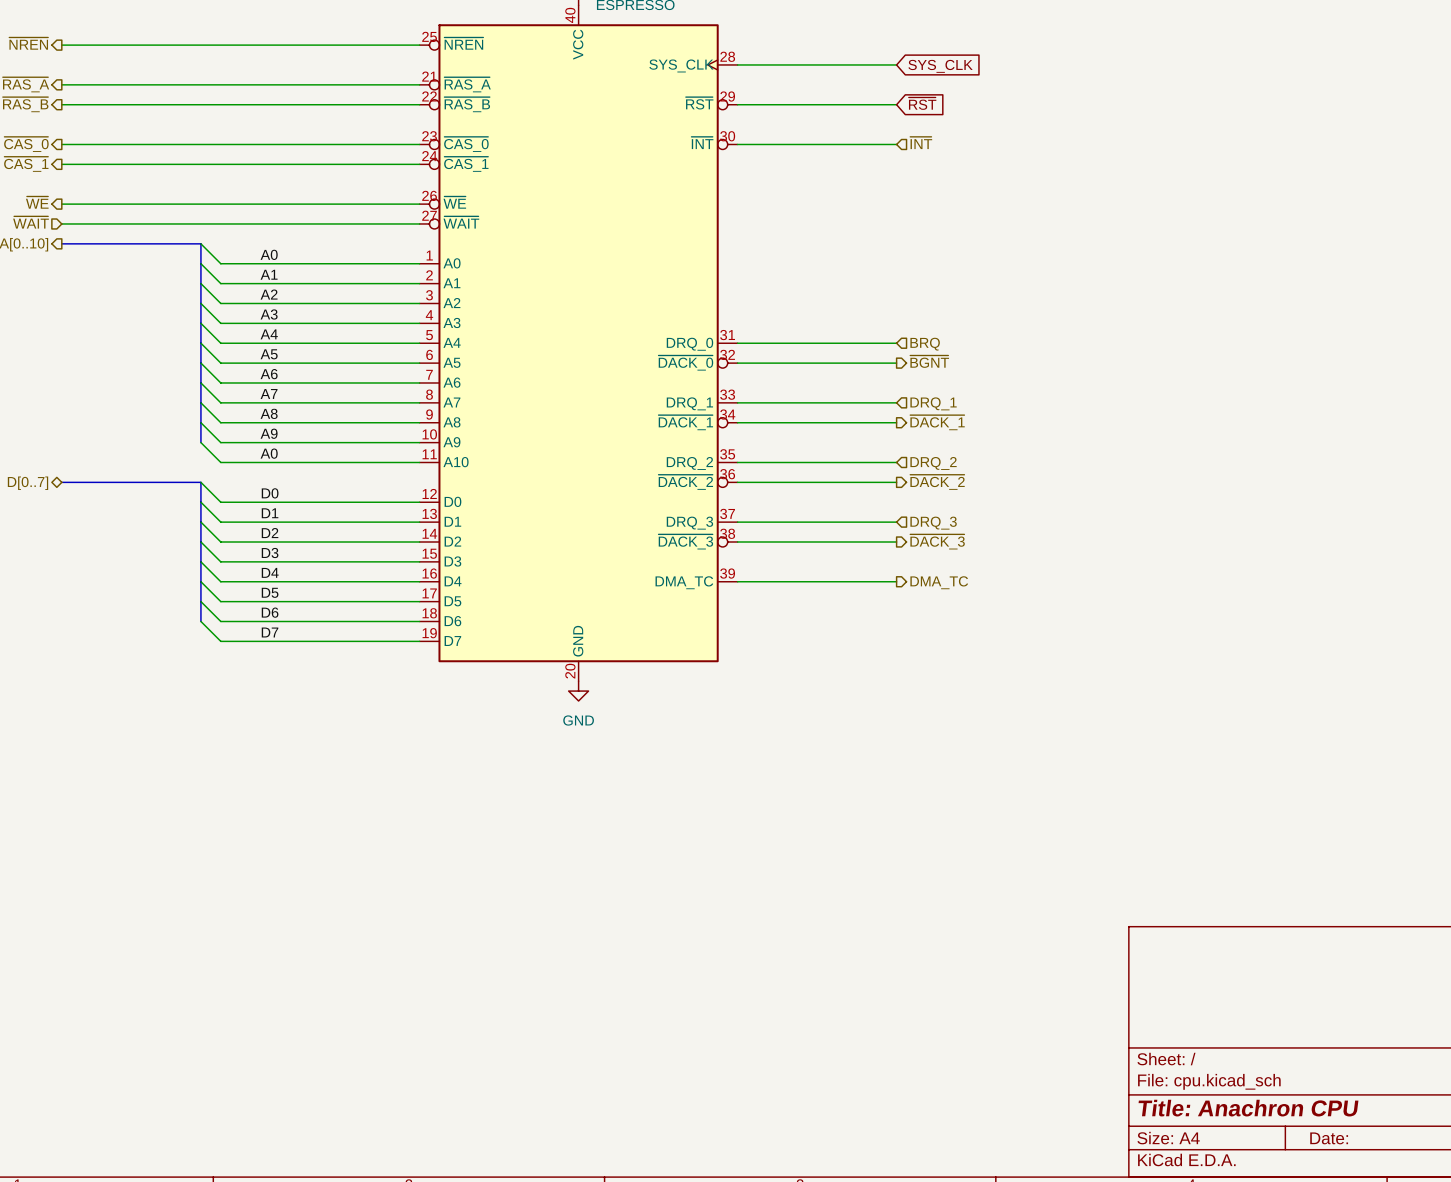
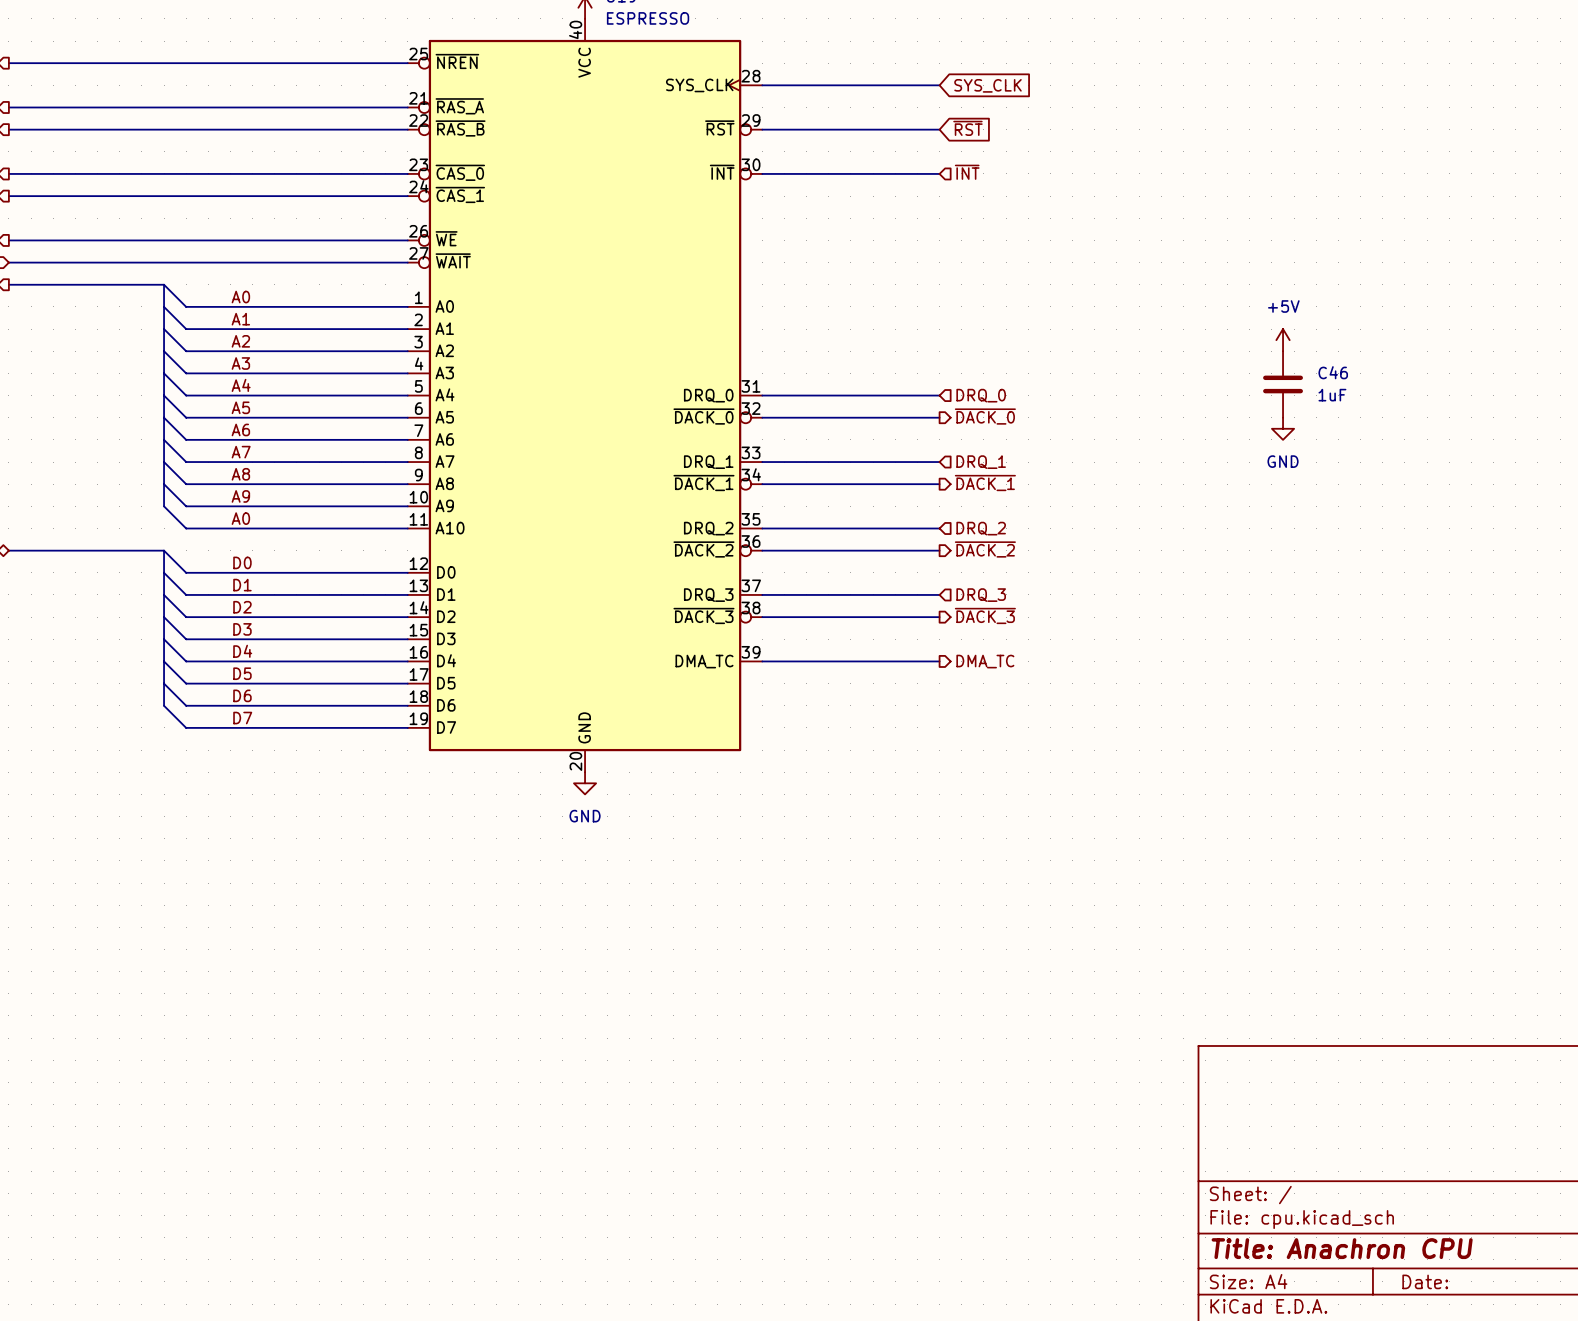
power symbol: none -> +5V (1283, 340)
C46: none -> 1uF (1283, 384)
hierarchical label: BRQ (925, 344) -> DRQ_0 (981, 395)
hierarchical label: ~{BGNT} (929, 361) -> ~{DACK_0} (985, 416)
power symbol: none -> GND (1283, 428)

